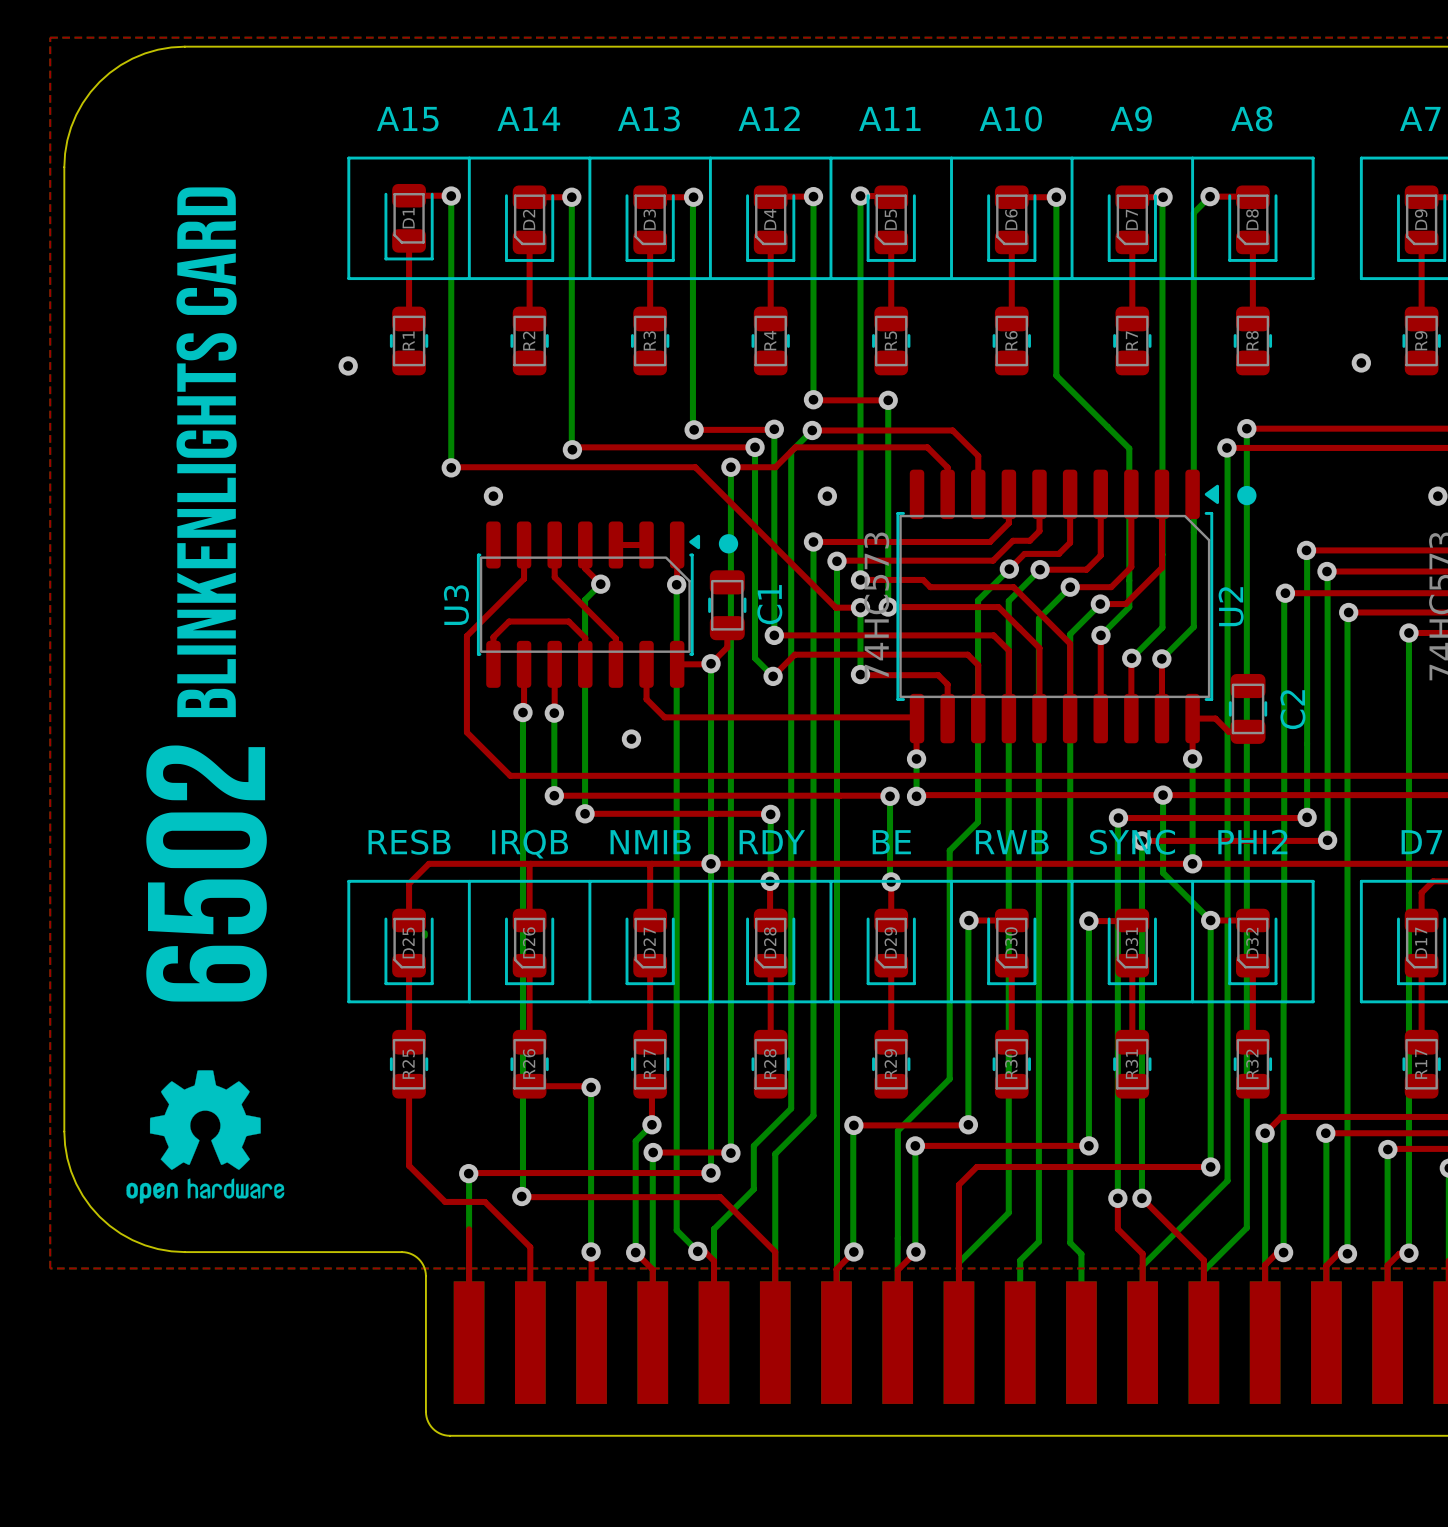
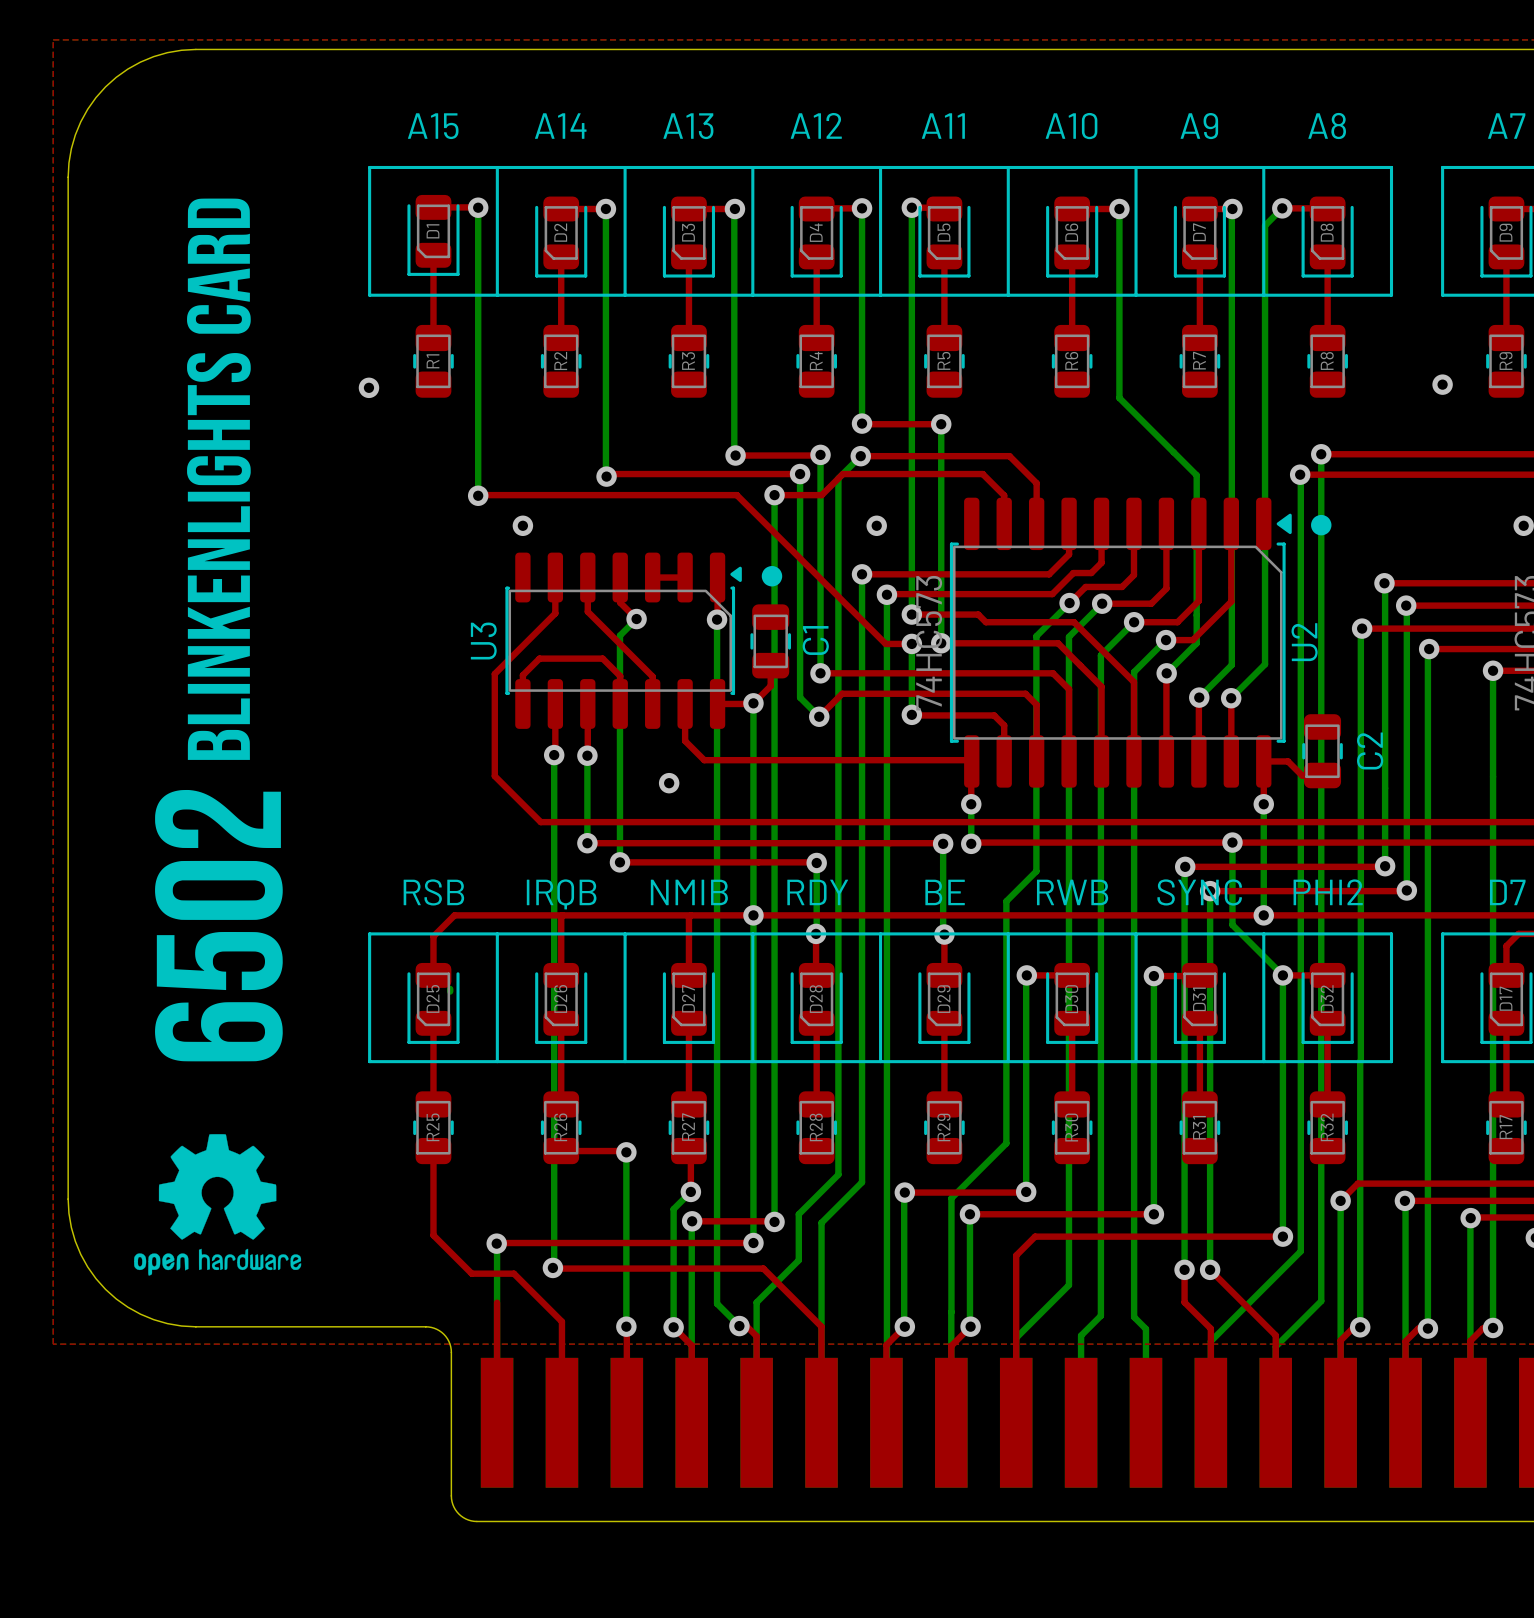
text: RESB (409, 842) -> RSB (433, 892)

